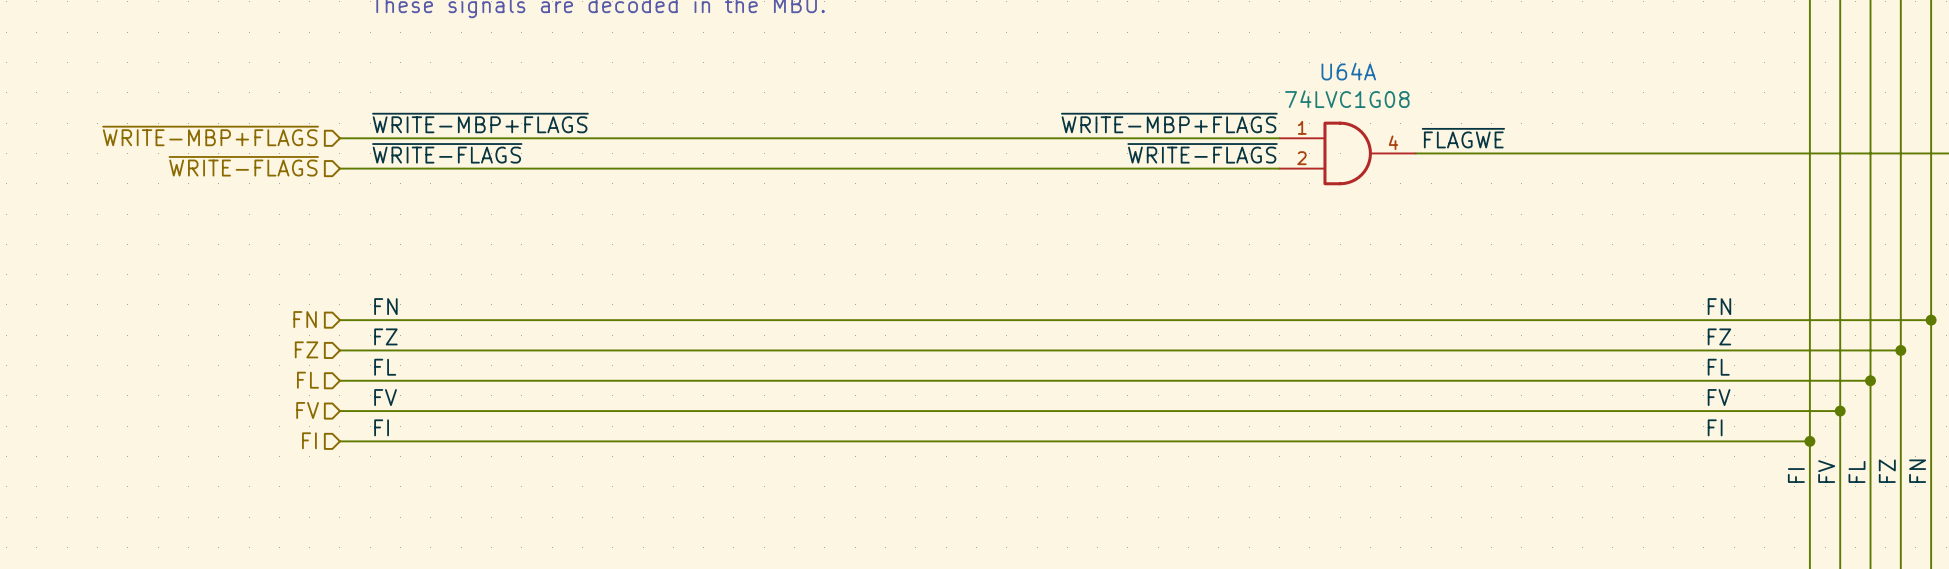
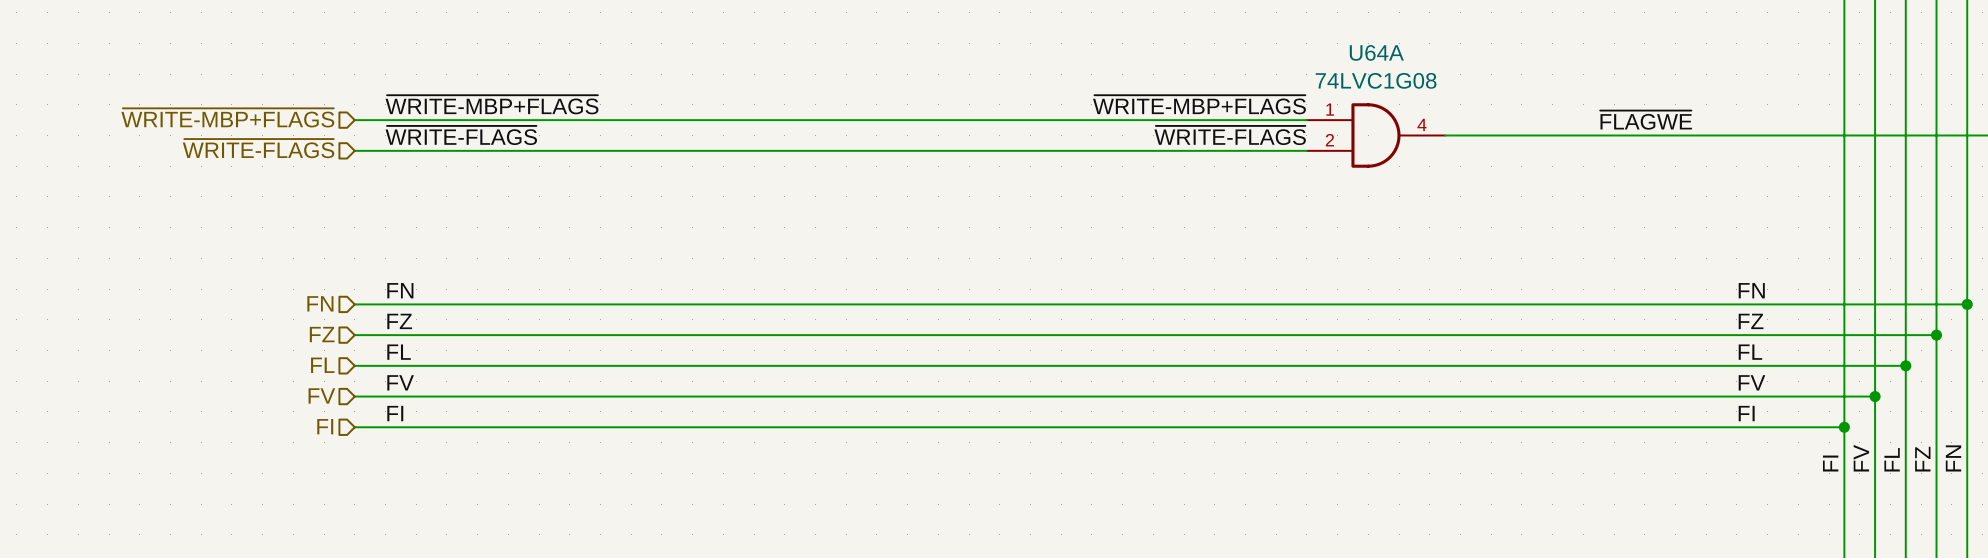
label position: ~{FLAGWE} (1463, 138) -> ~{FLAGWE} (1646, 120)

